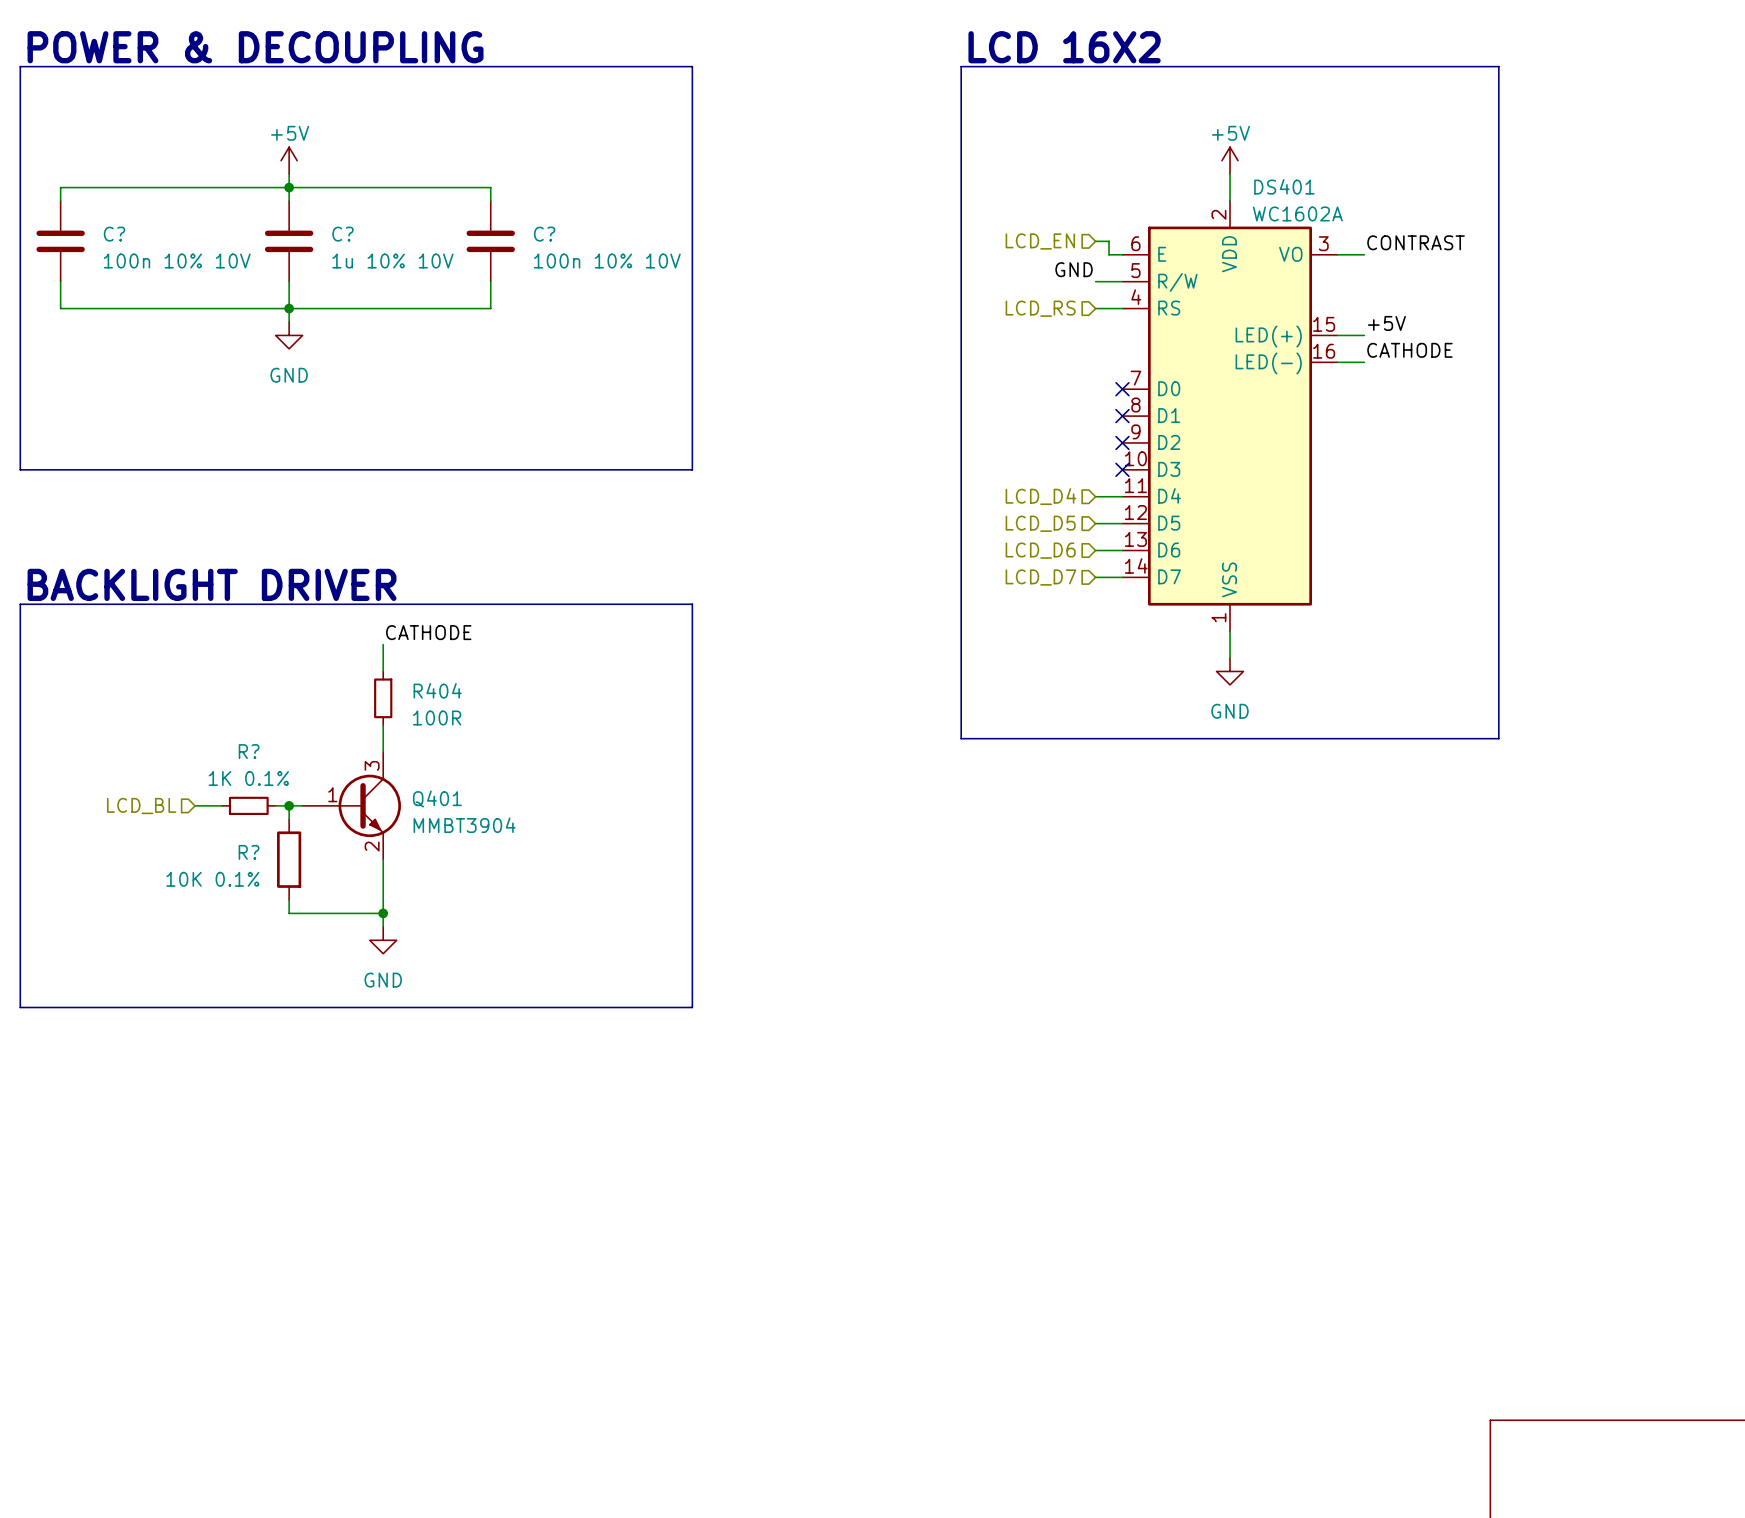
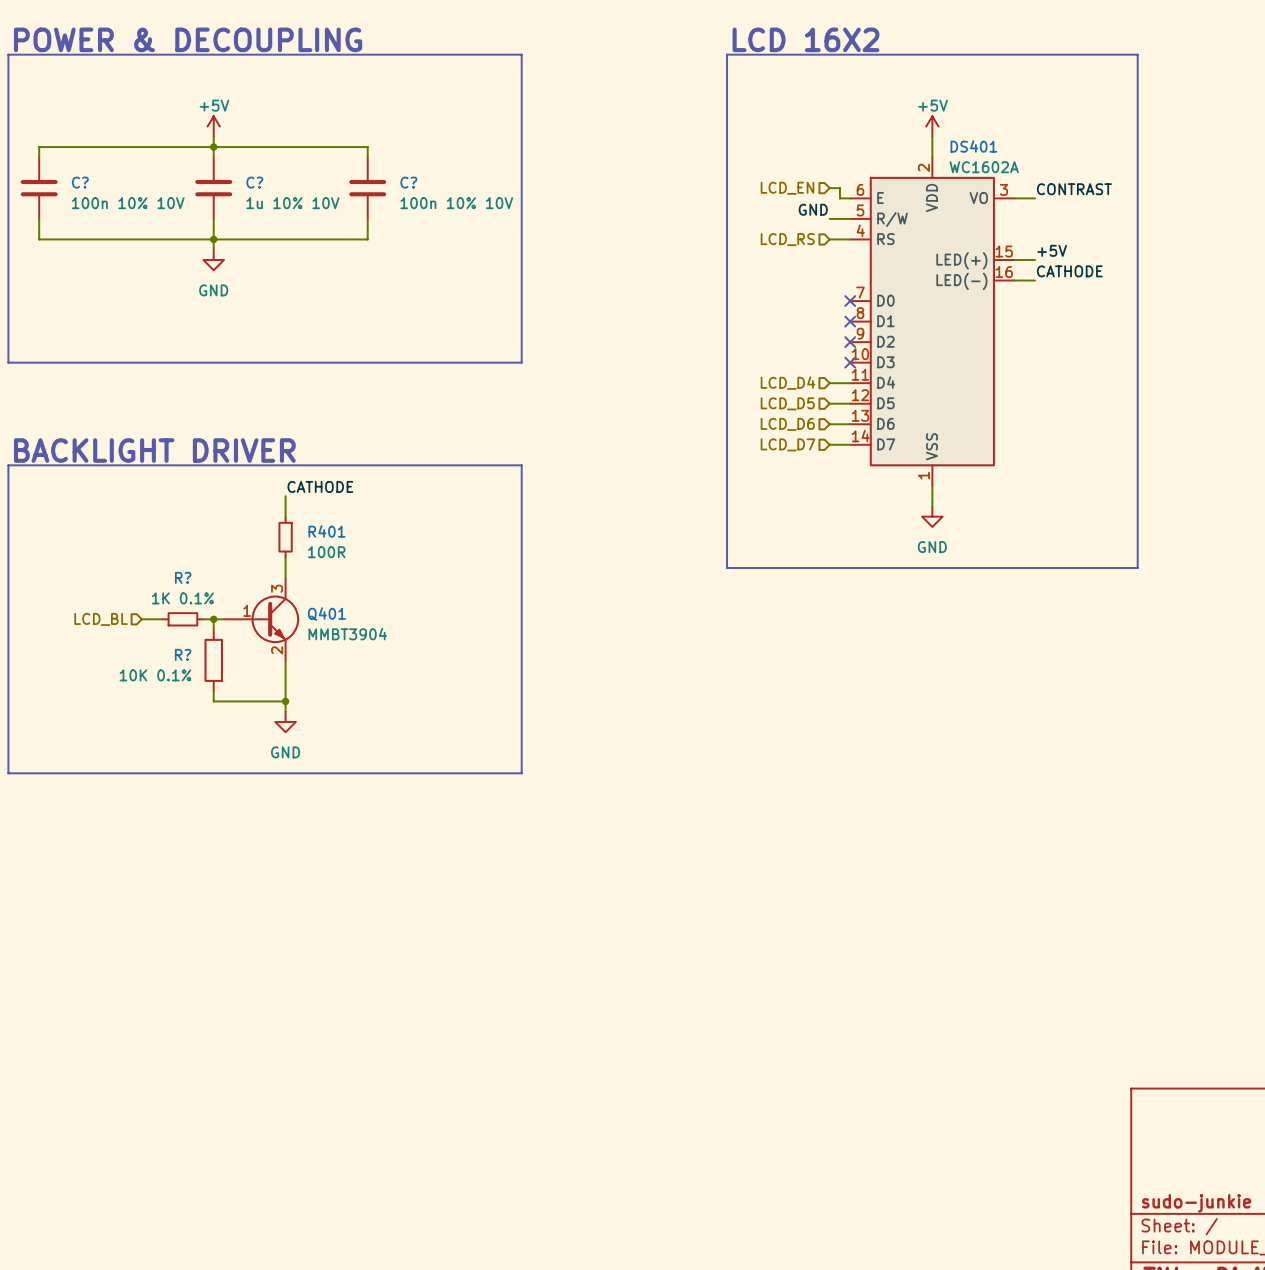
R404 name: R404 (437, 690) -> R401 (326, 531)

